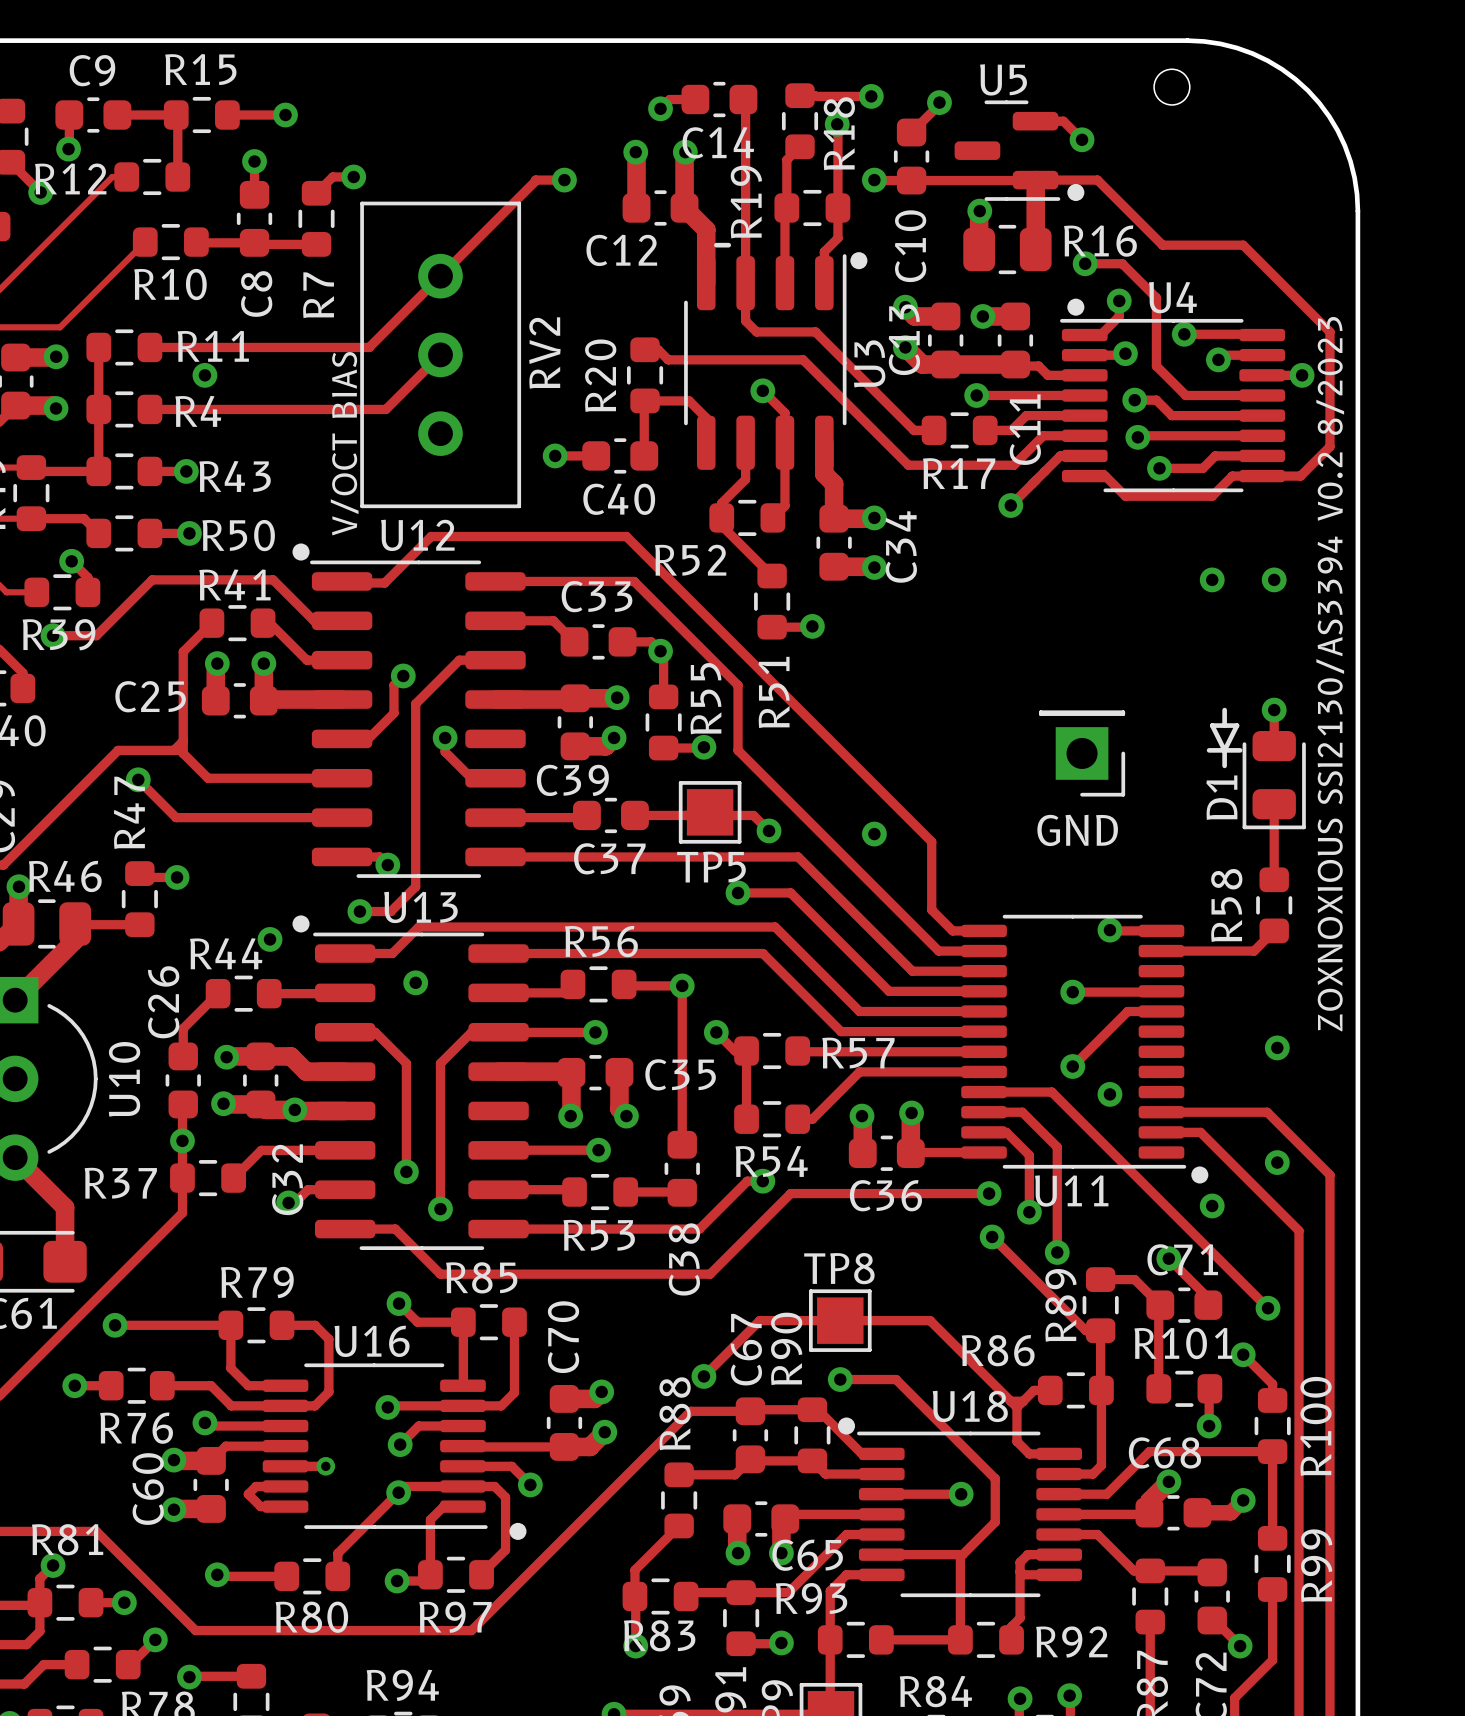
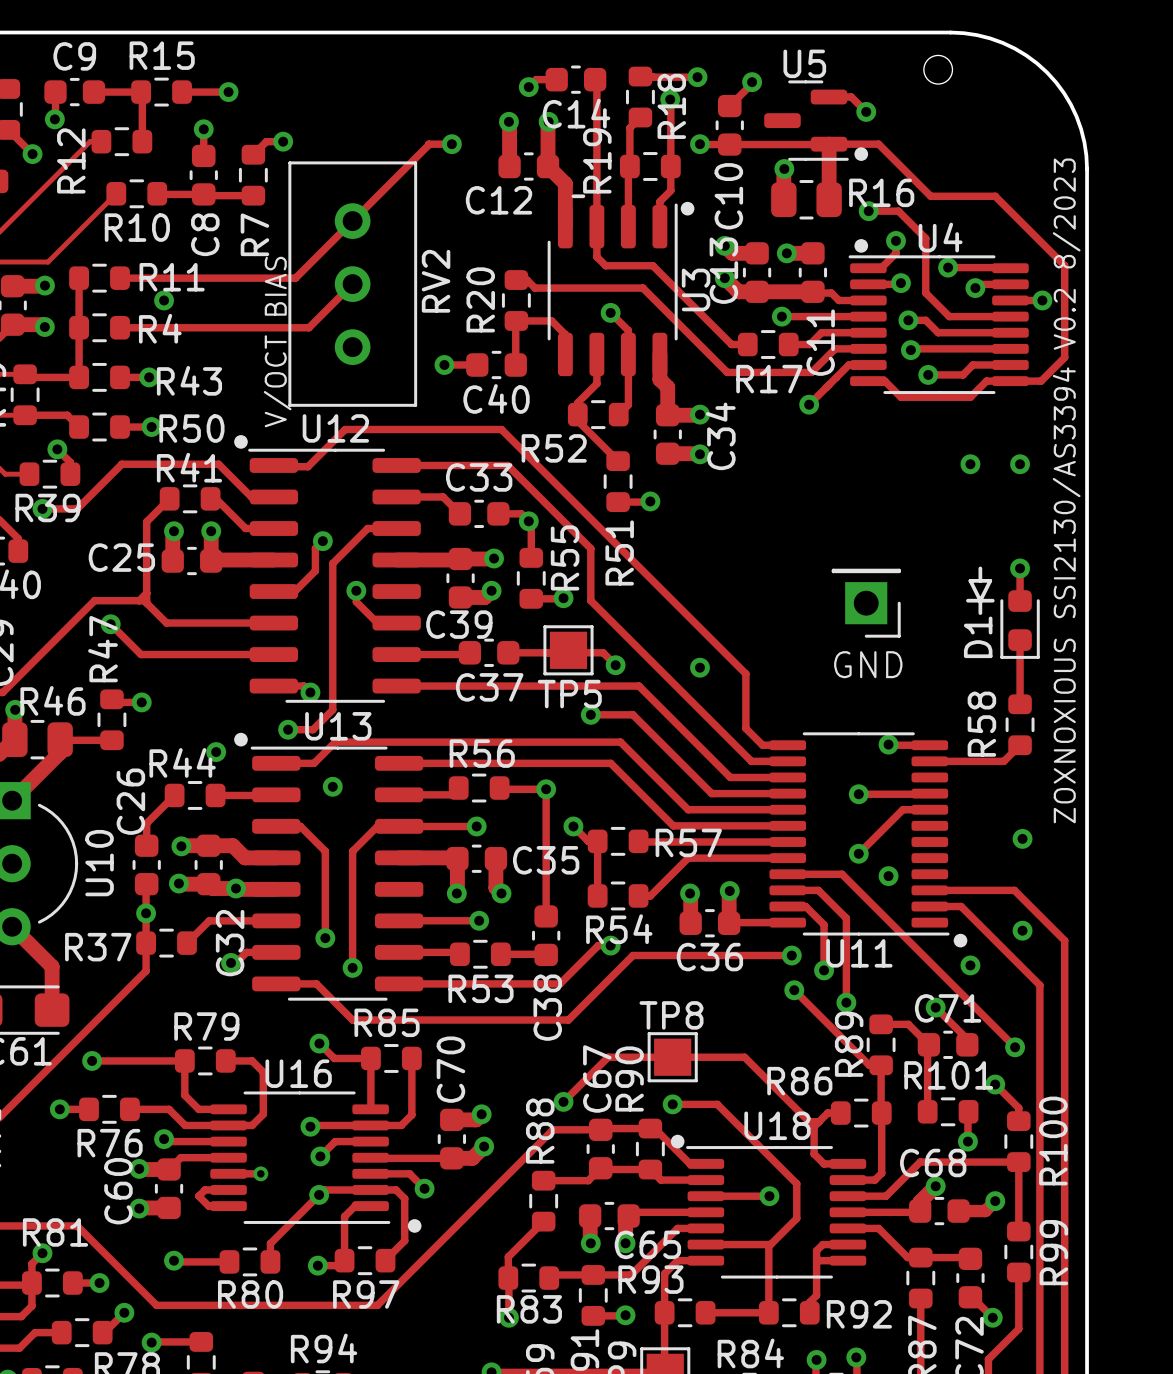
R12 name rotation: 0° (70, 178) -> 90° counterclockwise (71, 160)
D1 footprint: [1242, 731, 1306, 830] -> [1000, 590, 1040, 659]

